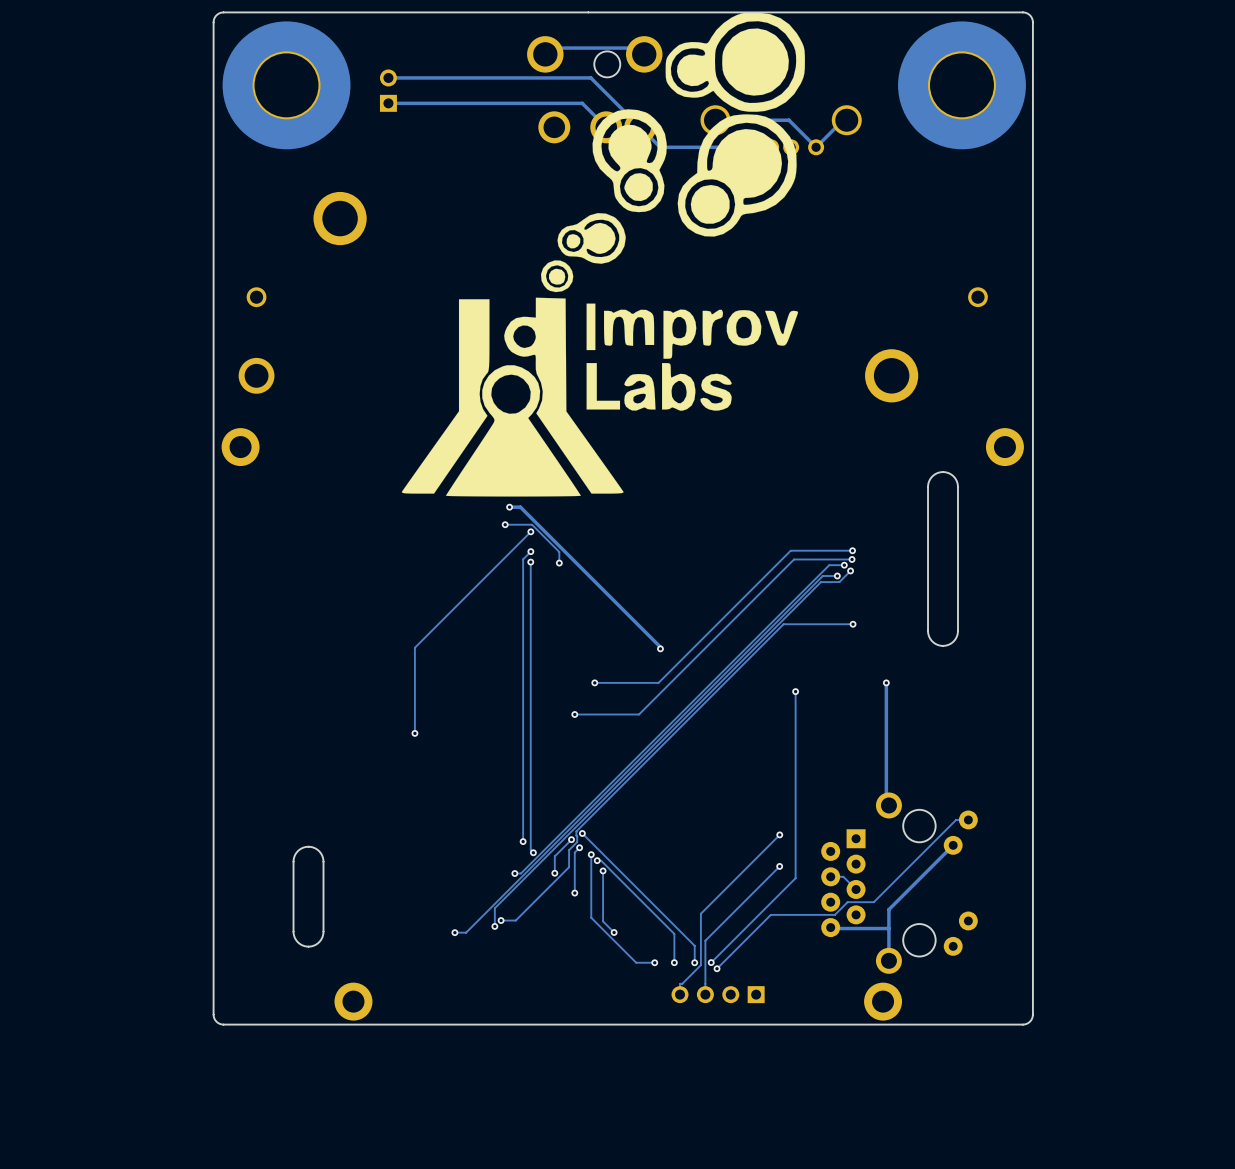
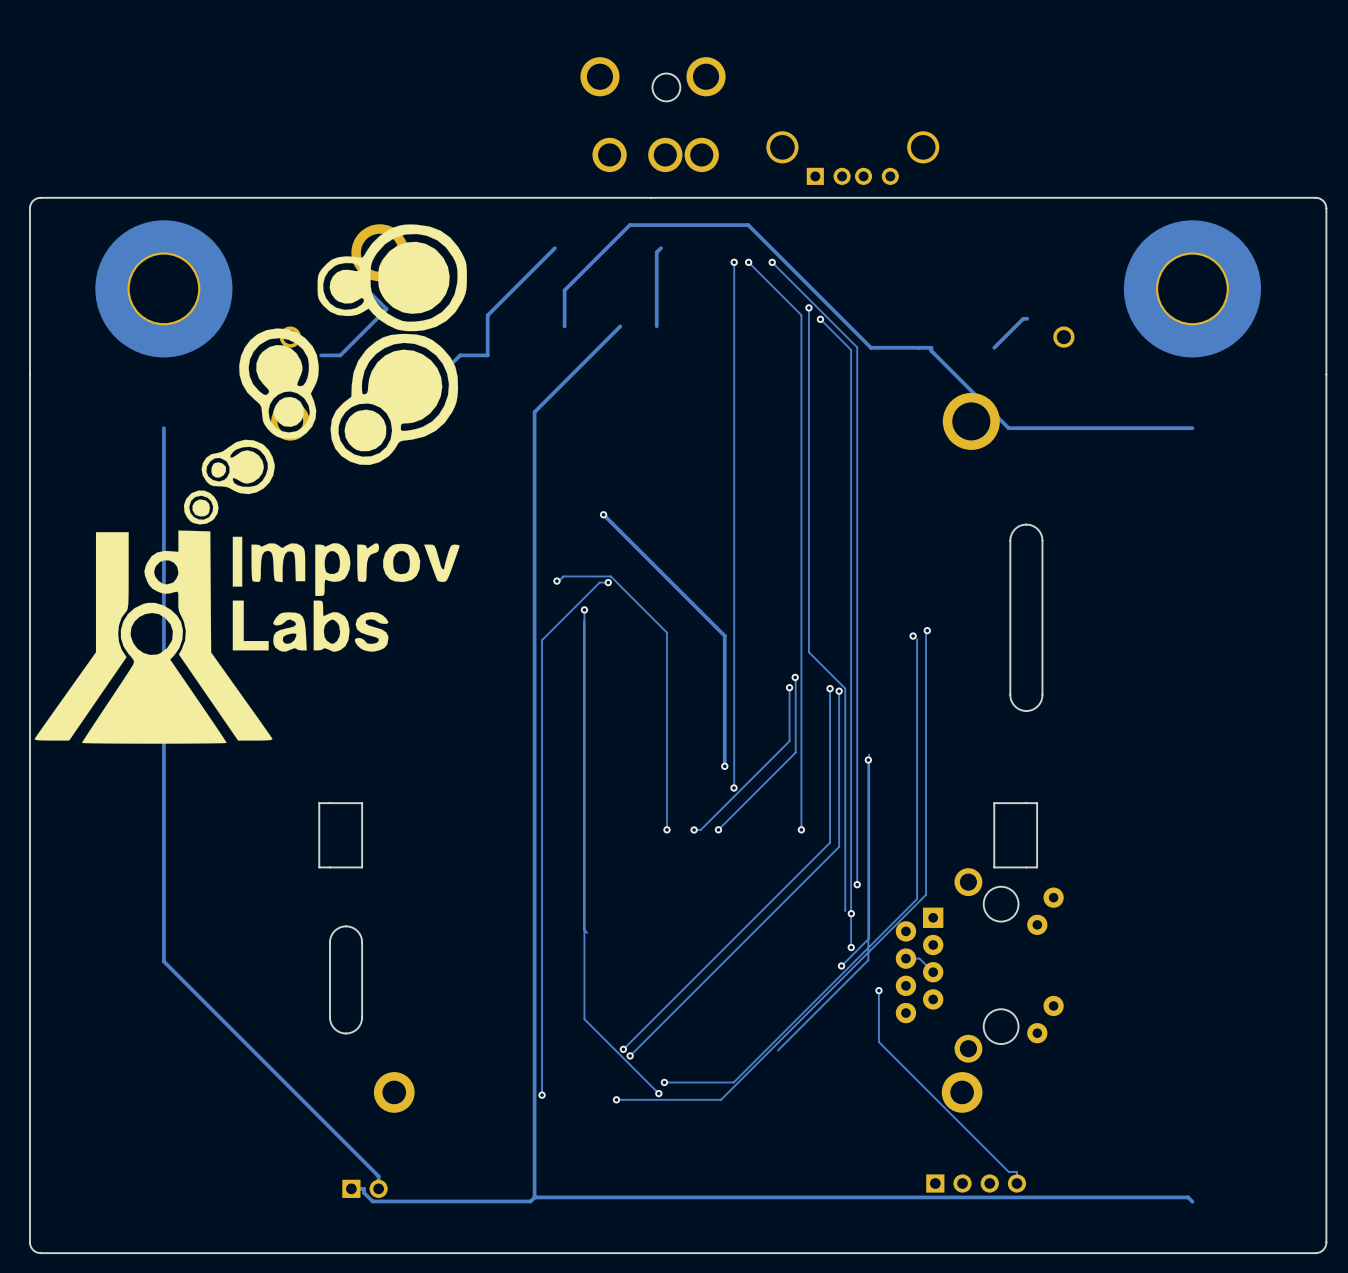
drawing: [401, 12, 805, 497] -> none
board edge: (1022, 12) (223, 12) (215, 16) (213, 22) (213, 1014) (217, 1022) (223, 1024) (1022, 1024) (1030, 1020) (1032, 1014) (1032, 22) (1030, 15) (1022, 12) -> (1315, 197) (1323, 200) (1326, 208) (1326, 1242) (1322, 1250) (1315, 1253) (40, 1253) (32, 1248) (29, 1242) (29, 208) (34, 200) (40, 197) (1315, 197)
track: (644, 54) (637, 48) (551, 48) (545, 54) -> none
track: (388, 77) (590, 77) (660, 147) (746, 147) -> none
part position: (286, 85) -> (163, 288)
part position: (961, 85) -> (1192, 288)
part: (388, 90) -> none
track: (388, 103) (582, 103) (606, 127) -> none
track: (846, 120) (843, 120) (816, 147) (789, 120) (715, 120) -> none
drawing: none -> [34, 224, 467, 744]
track: none -> (554, 248) (487, 315) (487, 355) (460, 355) (452, 362)
track: none -> (661, 248) (656, 252) (656, 326)
track: none -> (734, 262) (733, 787)
via: none -> (734, 262)
track: none -> (748, 262) (801, 315) (801, 829)
via: none -> (748, 262)
track: none -> (772, 262) (857, 347) (857, 884)
via: none -> (772, 262)
track: none -> (363, 286) (386, 309) (340, 355) (321, 355)
track: none -> (808, 307) (808, 652) (845, 688) (844, 910)
via: none -> (808, 307)
track: none -> (820, 319) (851, 349) (851, 943)
via: none -> (820, 319)
track: none -> (1027, 318) (1023, 318) (994, 347)
track: none -> (564, 326) (564, 290) (629, 225) (748, 225) (870, 347) (931, 347) (931, 350) (1008, 428) (1192, 428)
track: none -> (620, 326) (534, 412) (534, 1197)
track: none -> (163, 428) (163, 961) (378, 1176) (378, 1188)
part: (240, 447) -> none
part: (1004, 447) -> none
track: none -> (603, 514) (724, 635) (724, 766)
via: none -> (603, 514)
track: (509, 507) (520, 507) (660, 648) -> none
via: (509, 507) -> none
track: (505, 524) (532, 524) (559, 551) (559, 563) -> none
track: none -> (559, 580) (563, 576) (610, 576) (667, 632) (667, 829)
track: none -> (608, 582) (599, 582) (542, 640) (542, 1095)
via: none -> (608, 582)
track: (530, 531) (414, 647) (414, 733) -> none
via: (530, 531) -> none
track: none -> (584, 607) (584, 1019) (658, 1093)
track: (852, 550) (790, 550) (658, 682) (594, 682) -> none
via: (852, 550) -> none
track: (530, 551) (523, 559) (523, 841) -> none
track: (852, 559) (794, 559) (639, 714) (574, 714) -> none
via: (852, 559) -> none
via: (530, 562) -> none
via: (559, 563) -> none
track: (844, 565) (829, 565) (520, 873) (514, 873) -> none
via: (844, 565) -> none
track: (850, 570) (839, 582) (820, 582) (494, 908) (494, 926) -> none
track: none -> (926, 634) (926, 894) (721, 1099) (616, 1099)
track: (837, 576) (822, 576) (466, 932) (454, 932) -> none
track: none -> (917, 639) (917, 899) (733, 1082) (664, 1082)
track: none -> (795, 677) (795, 752) (718, 829)
via: none -> (795, 677)
track: none -> (789, 687) (789, 741) (700, 829) (694, 829)
via: none -> (789, 687)
track: (853, 624) (783, 624) (576, 831) (577, 842) (569, 850) (569, 867) (515, 920) (501, 920) -> none
via: (853, 624) -> none
track: none -> (830, 688) (830, 842) (623, 1049)
via: none -> (830, 688)
track: none -> (839, 691) (839, 846) (630, 1055)
via: none -> (839, 691)
via: (660, 648) -> none
via: (594, 682) -> none
track: (886, 682) (886, 802) (888, 805) -> none
via: (886, 682) -> none
track: none -> (869, 754) (869, 938) (841, 965)
via: none -> (724, 766)
via: (574, 714) -> none
via: none -> (733, 787)
board edge: none -> (362, 803) (319, 803) (319, 867) (362, 867) (362, 803)
board edge: none -> (1037, 803) (1037, 867) (994, 867) (994, 803) (1037, 803)
via: (414, 733) -> none
via: none -> (667, 829)
via: none -> (694, 829)
via: none -> (718, 829)
via: none -> (801, 829)
via: none -> (857, 884)
track: (968, 819) (956, 819) (873, 902) (847, 902) (834, 914) (770, 914) (717, 968) -> none
track: (582, 833) (694, 945) (694, 962) -> none
via: (582, 833) -> none
track: (779, 834) (700, 913) (700, 965) (680, 983) (680, 994) -> none
track: (571, 839) (554, 856) (554, 873) -> none
via: (571, 839) -> none
via: (523, 841) -> none
track: (953, 845) (888, 909) (888, 960) -> none
track: (579, 847) (574, 852) (574, 893) -> none
via: (579, 847) -> none
via: (533, 852) -> none
track: (591, 854) (591, 917) (636, 962) (654, 962) -> none
via: (591, 854) -> none
track: (597, 860) (601, 860) (674, 933) (674, 962) -> none
via: (597, 860) -> none
track: (779, 866) (705, 940) (705, 994) -> none
track: (603, 870) (603, 921) (614, 932) -> none
via: (603, 870) -> none
via: (514, 873) -> none
via: (554, 873) -> none
via: none -> (841, 965)
via: (574, 893) -> none
track: none -> (878, 990) (878, 1042) (1008, 1171) (1016, 1171) (1016, 1183)
via: none -> (878, 990)
via: (501, 920) -> none
via: (494, 926) -> none
track: (830, 927) (888, 928) -> none
via: (454, 932) -> none
via: (614, 932) -> none
via: none -> (623, 1049)
via: (654, 962) -> none
via: (674, 962) -> none
via: (694, 962) -> none
via: (711, 962) -> none
via: none -> (630, 1055)
via: (717, 968) -> none
via: none -> (664, 1082)
part rotation: 0° (718, 994) -> 180° (976, 1183)
part position: (718, 994) -> (976, 1183)
via: none -> (658, 1093)
via: none -> (542, 1095)
via: none -> (616, 1099)
track: none -> (351, 1188) (364, 1188) (364, 1192) (372, 1201) (530, 1201) (534, 1197)
part: none -> (365, 1188)
track: none -> (534, 1197) (1188, 1197) (1192, 1201)

